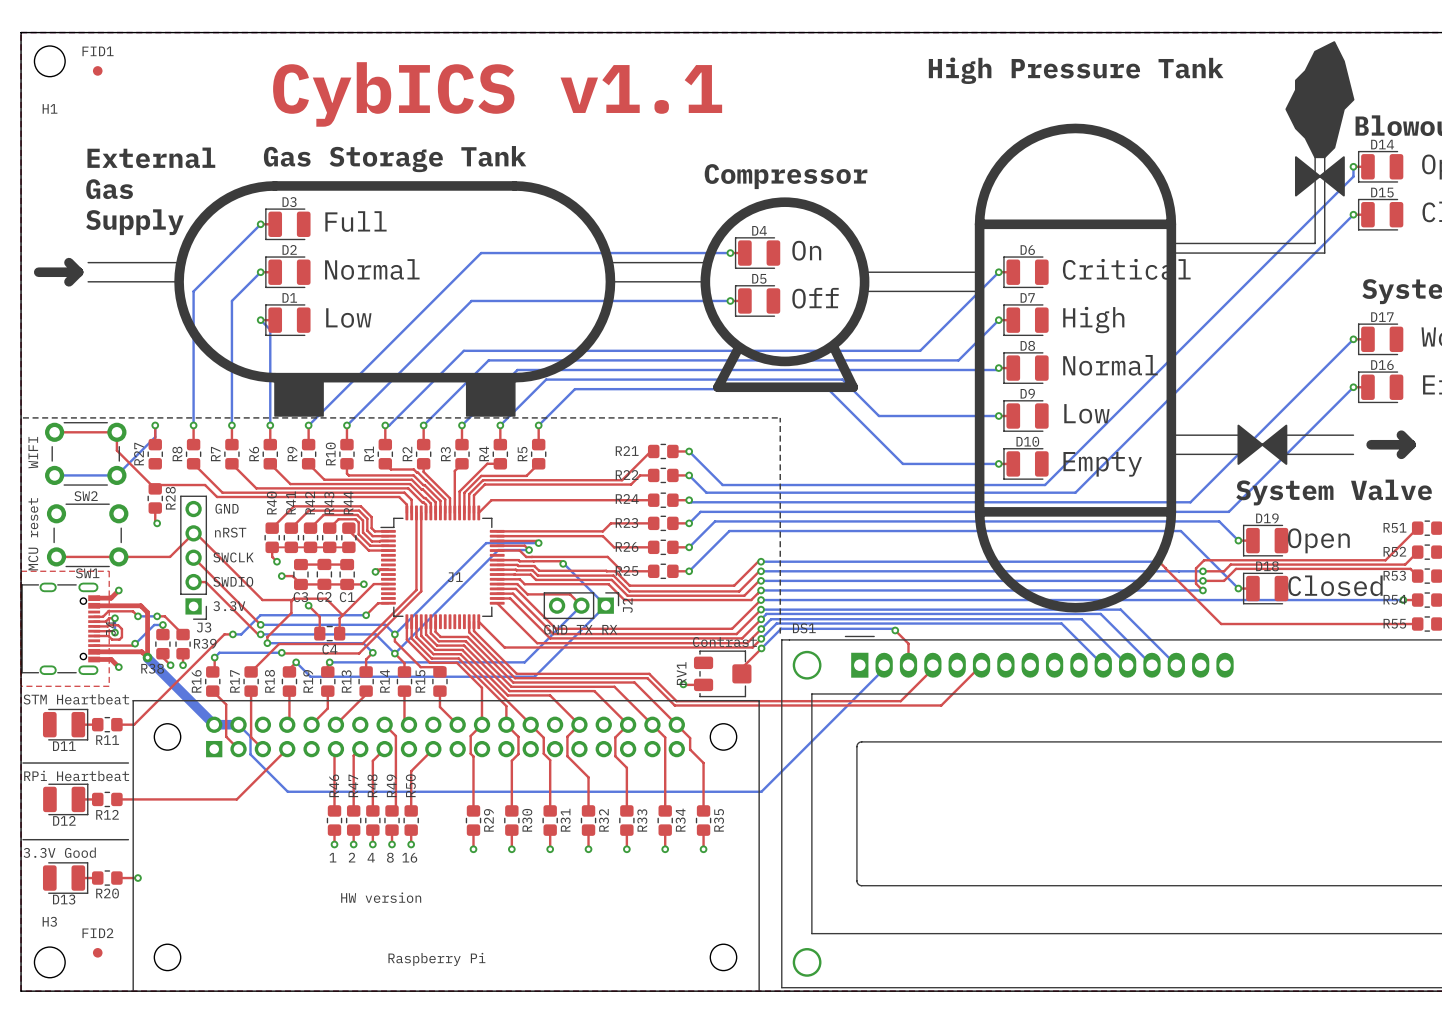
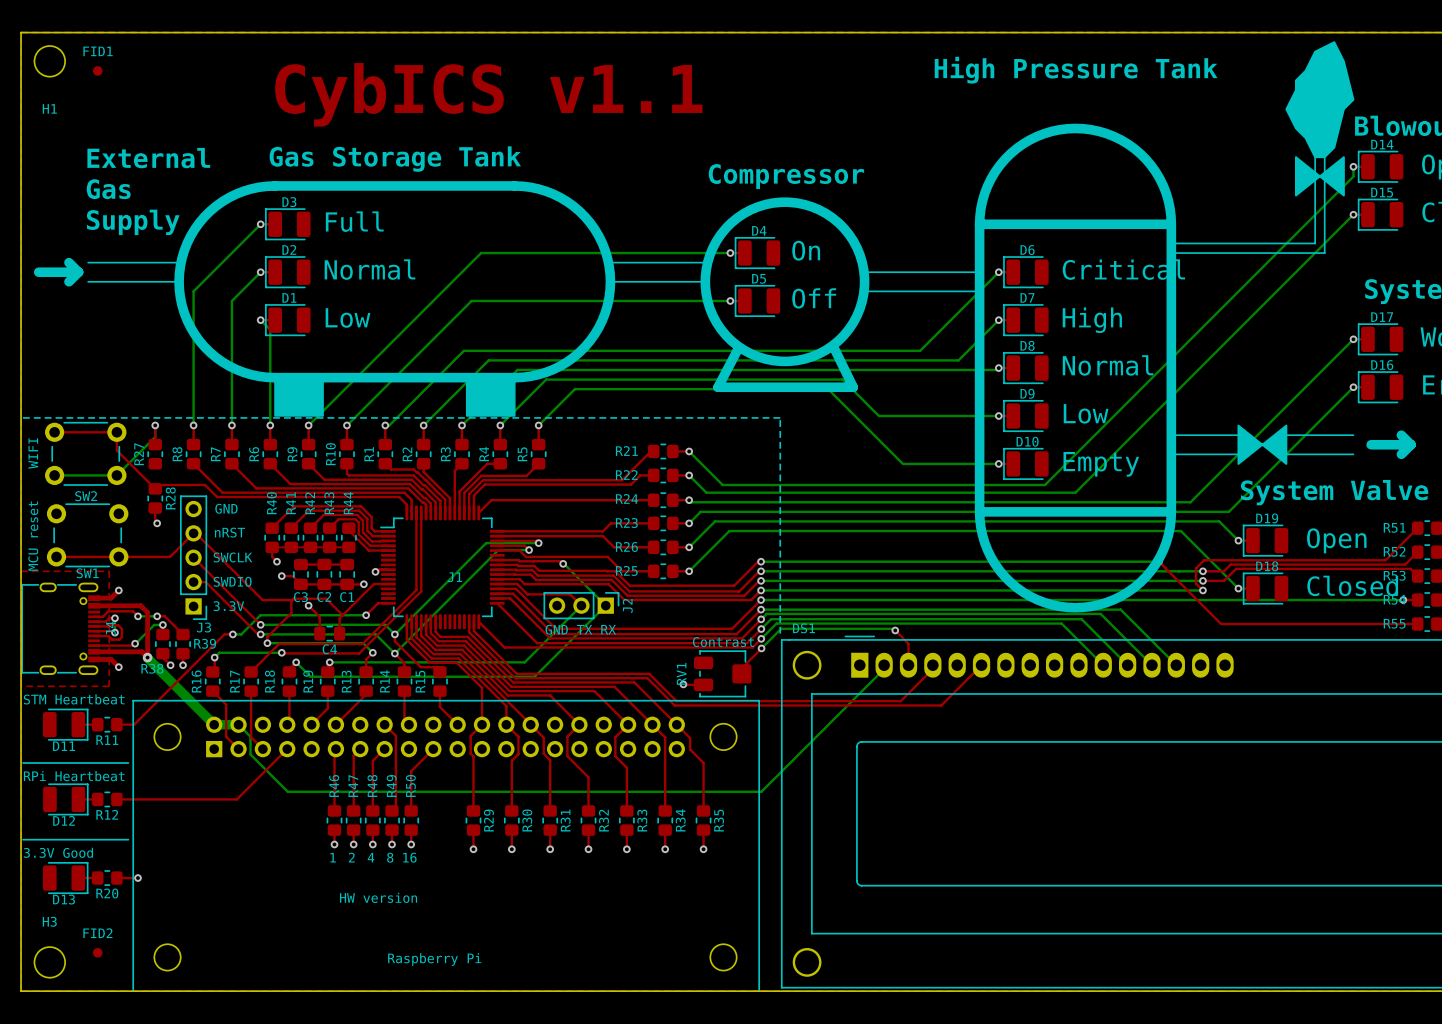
text position: Open (1318, 540) -> Open (1336, 540)
text position: Closed (1335, 585) -> Closed (1352, 585)

